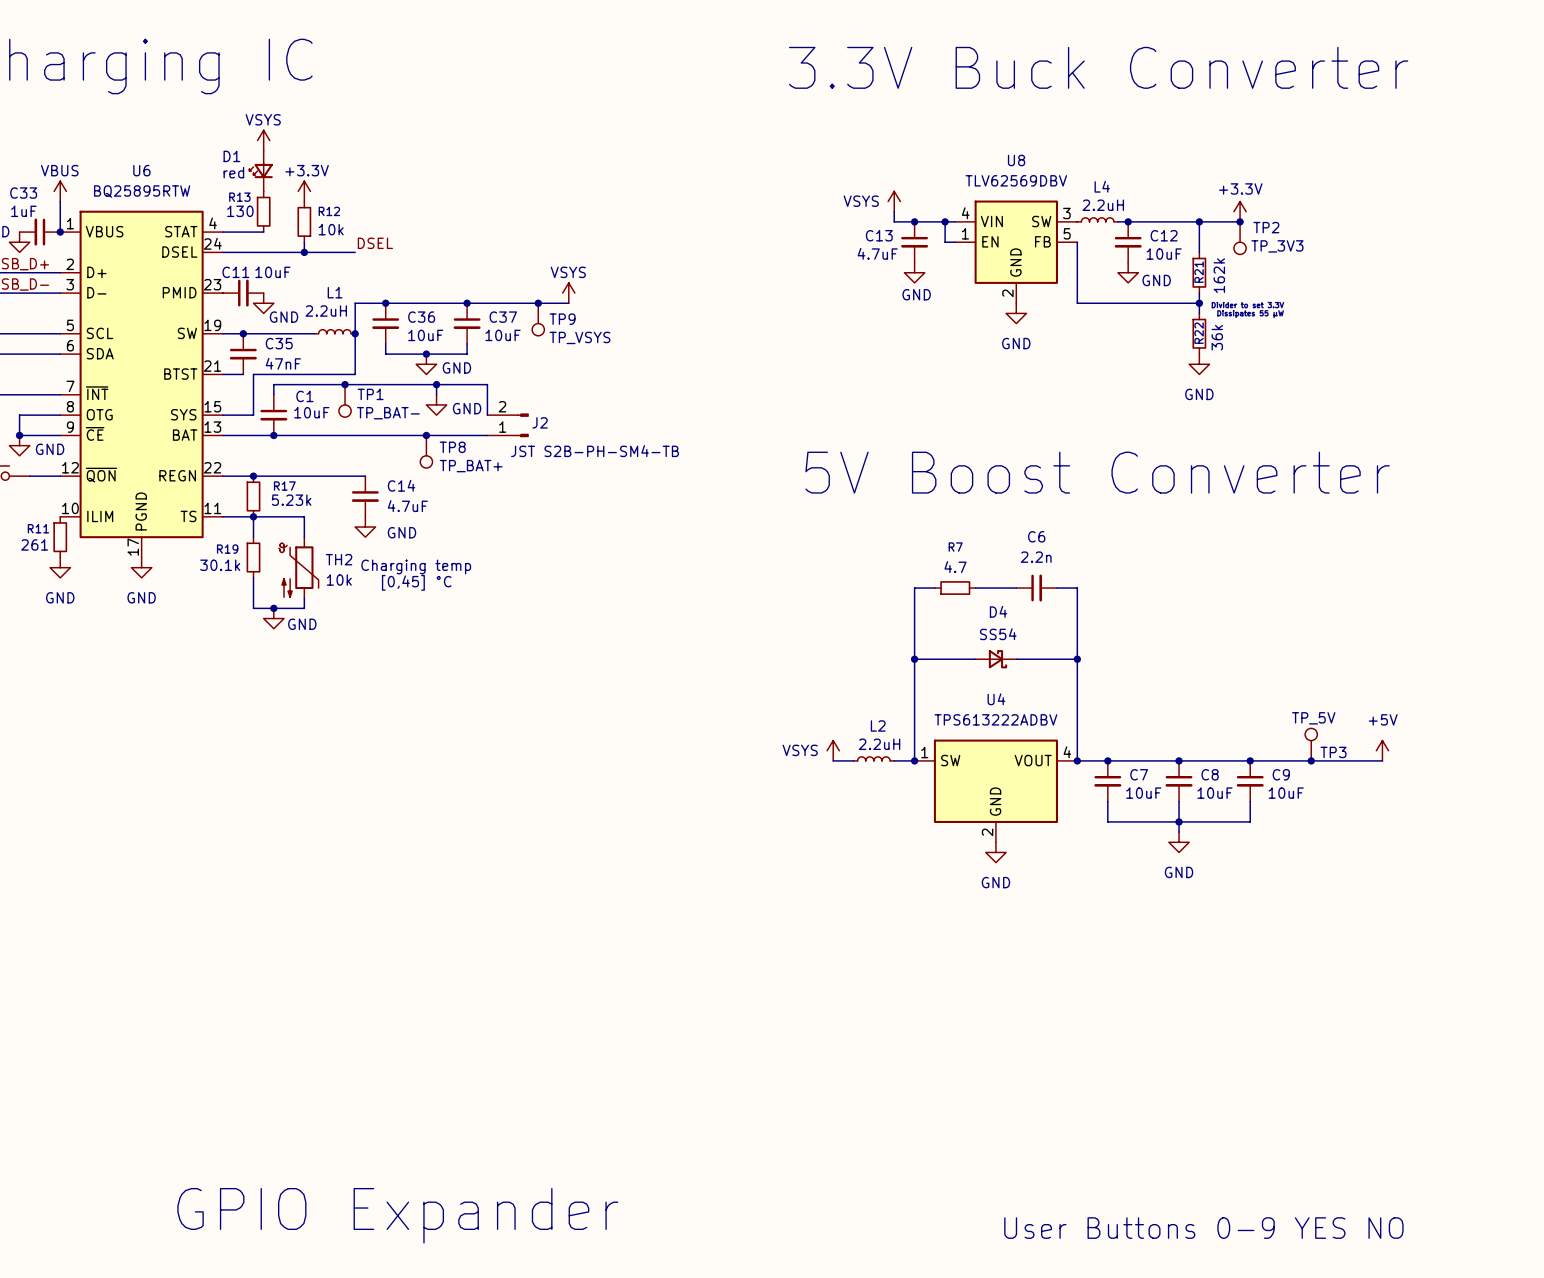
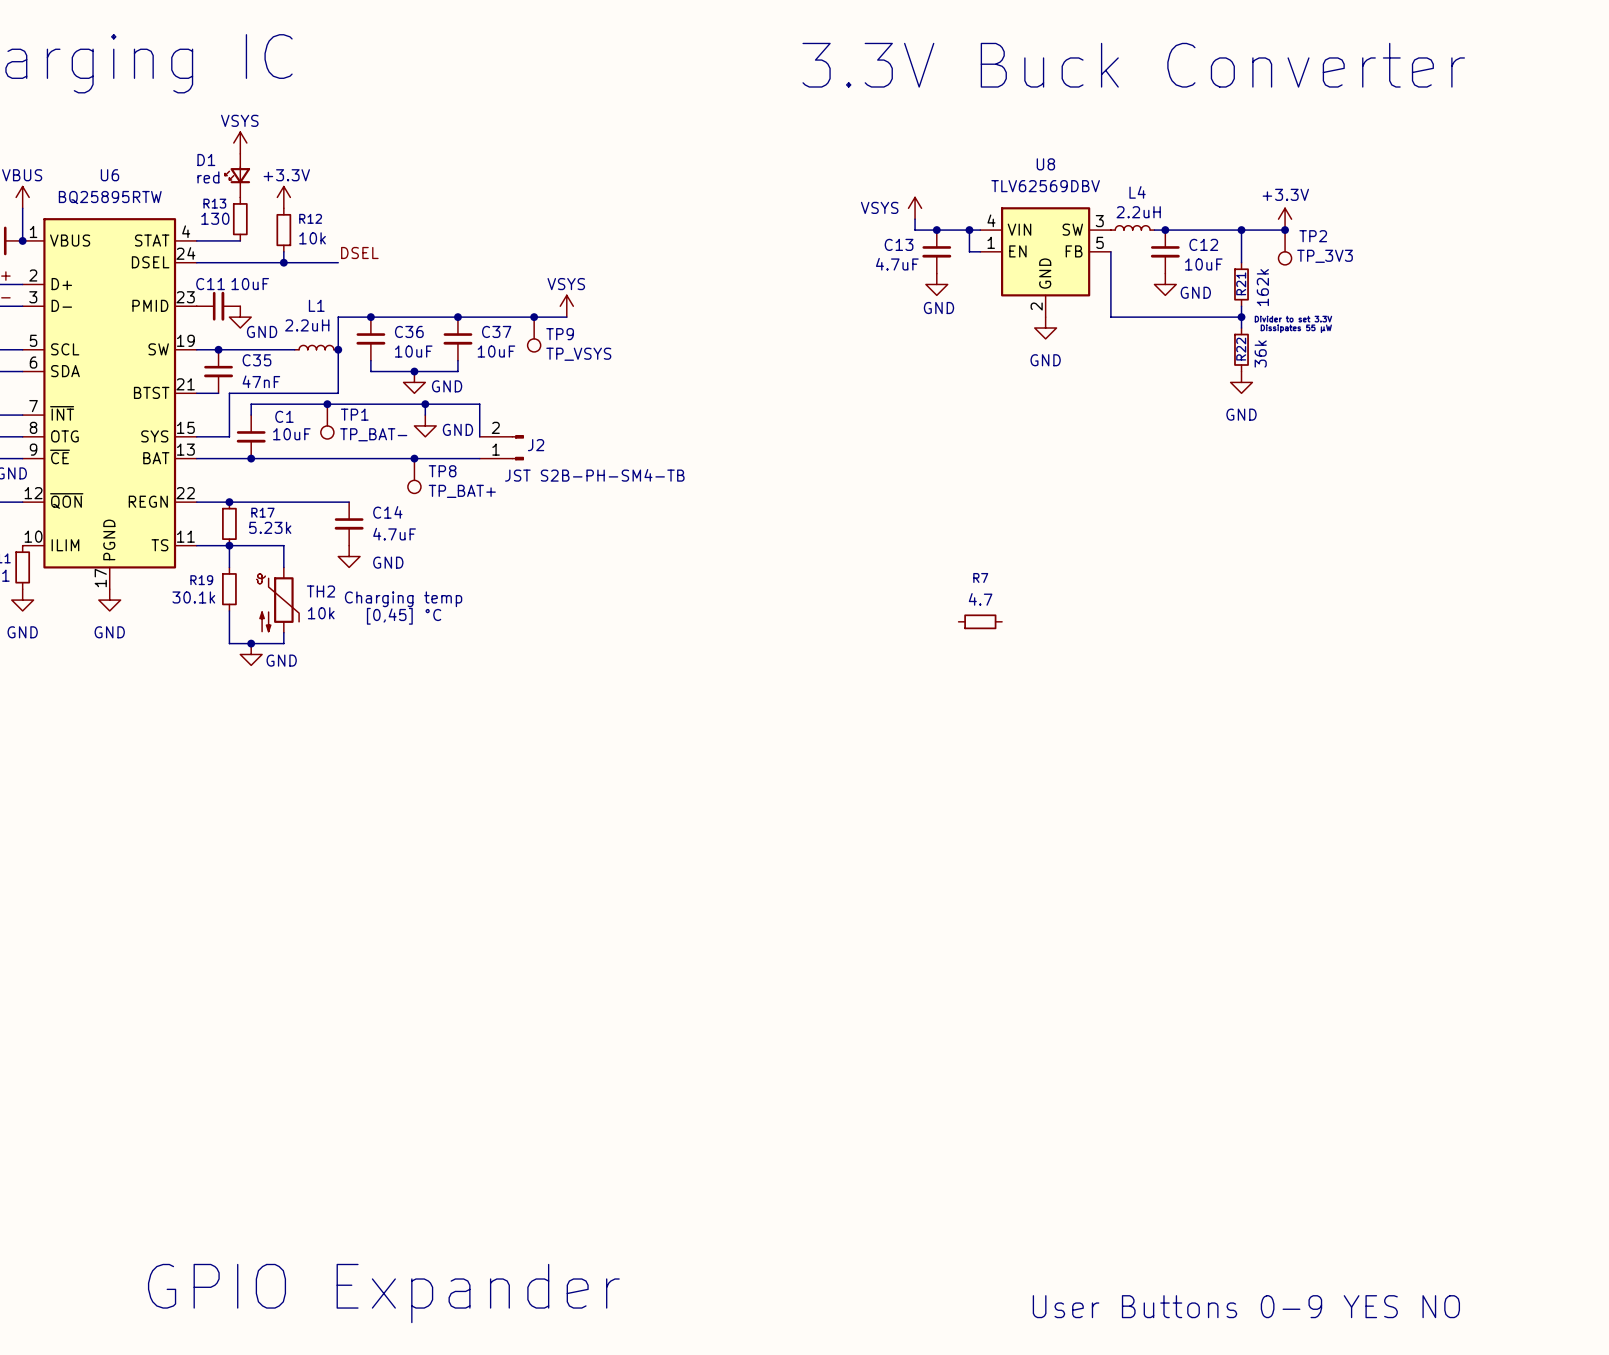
text: 5V Boost Converter (1097, 472) -> none
wire: (934, 588) (914, 588) (914, 760) (894, 760) -> none
wire: (975, 588) (1016, 588) -> none
C6: 2.2n (1036, 588) -> none
wire: (1056, 588) (1077, 588) (1077, 760) (1382, 760) -> none
wire: (914, 659) (975, 659) -> none
junction: (914, 659) -> none
D4: SS54 (995, 659) -> none
wire: (1016, 659) (1077, 659) -> none
junction: (1077, 659) -> none
TP3: TP_5V (1311, 744) -> none
power symbol: VSYS (833, 750) -> none
power symbol: +5V (1382, 750) -> none
L2: 2.2uH (873, 758) -> none
wire: (833, 760) (853, 760) -> none
junction: (914, 760) -> none
junction: (1077, 760) -> none
junction: (1107, 760) -> none
junction: (1179, 760) -> none
junction: (1250, 760) -> none
junction: (1311, 760) -> none
C7: 10uF (1107, 781) -> none
C8: 10uF (1179, 781) -> none
C9: 10uF (1250, 781) -> none
U4: TPS613222ADBV (995, 790) -> none
wire: (1107, 801) (1107, 821) (1250, 821) (1250, 801) -> none
wire: (1179, 801) (1179, 832) -> none
junction: (1179, 821) -> none
power symbol: GND (1179, 842) -> none
power symbol: GND (995, 852) -> none

